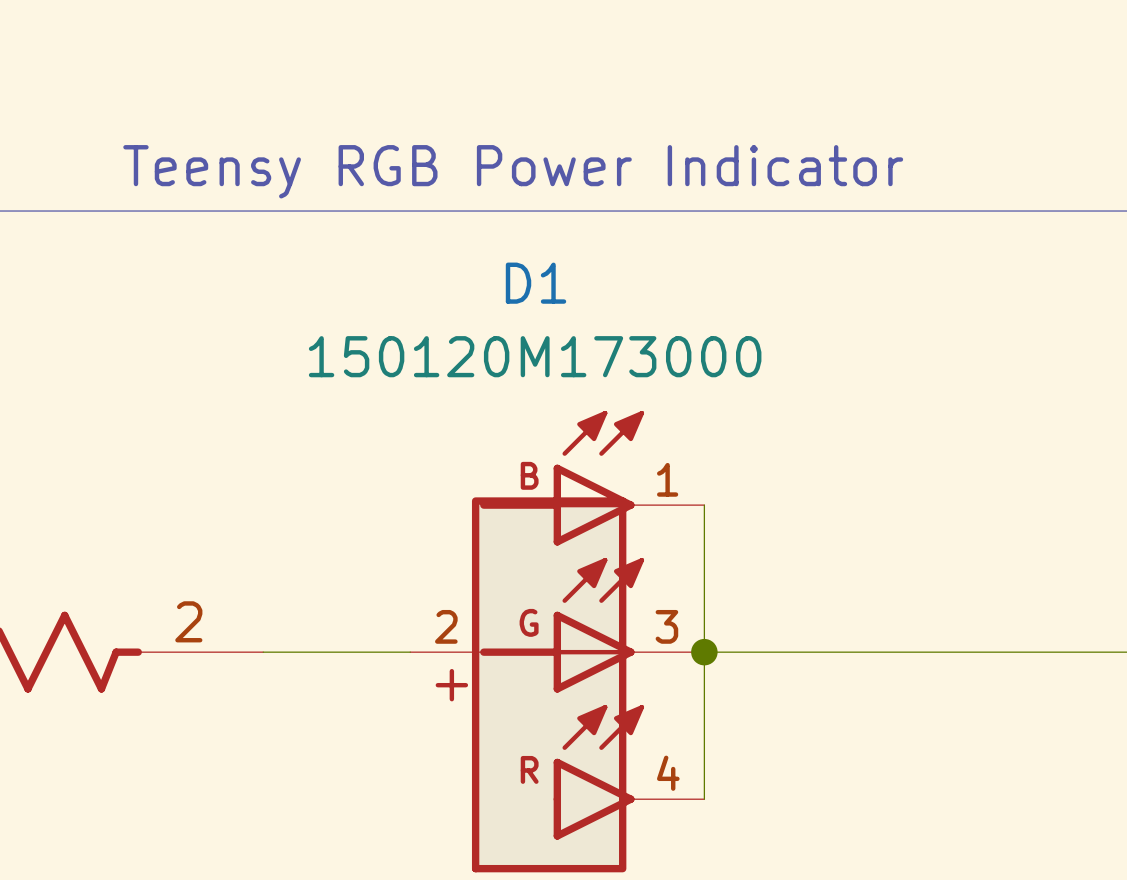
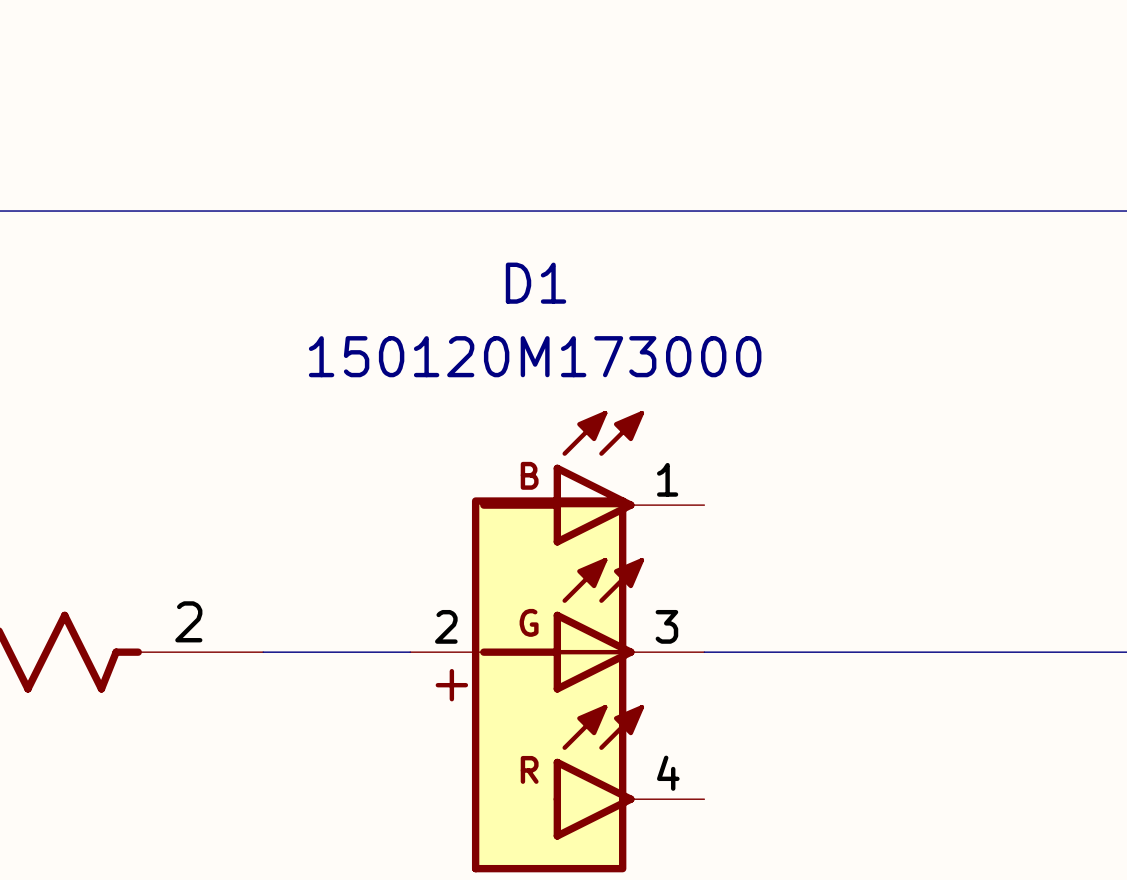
text: Teensy RGB Power Indicator (513, 171) -> none
wire: (704, 505) (704, 799) -> none
junction: (704, 652) -> none

